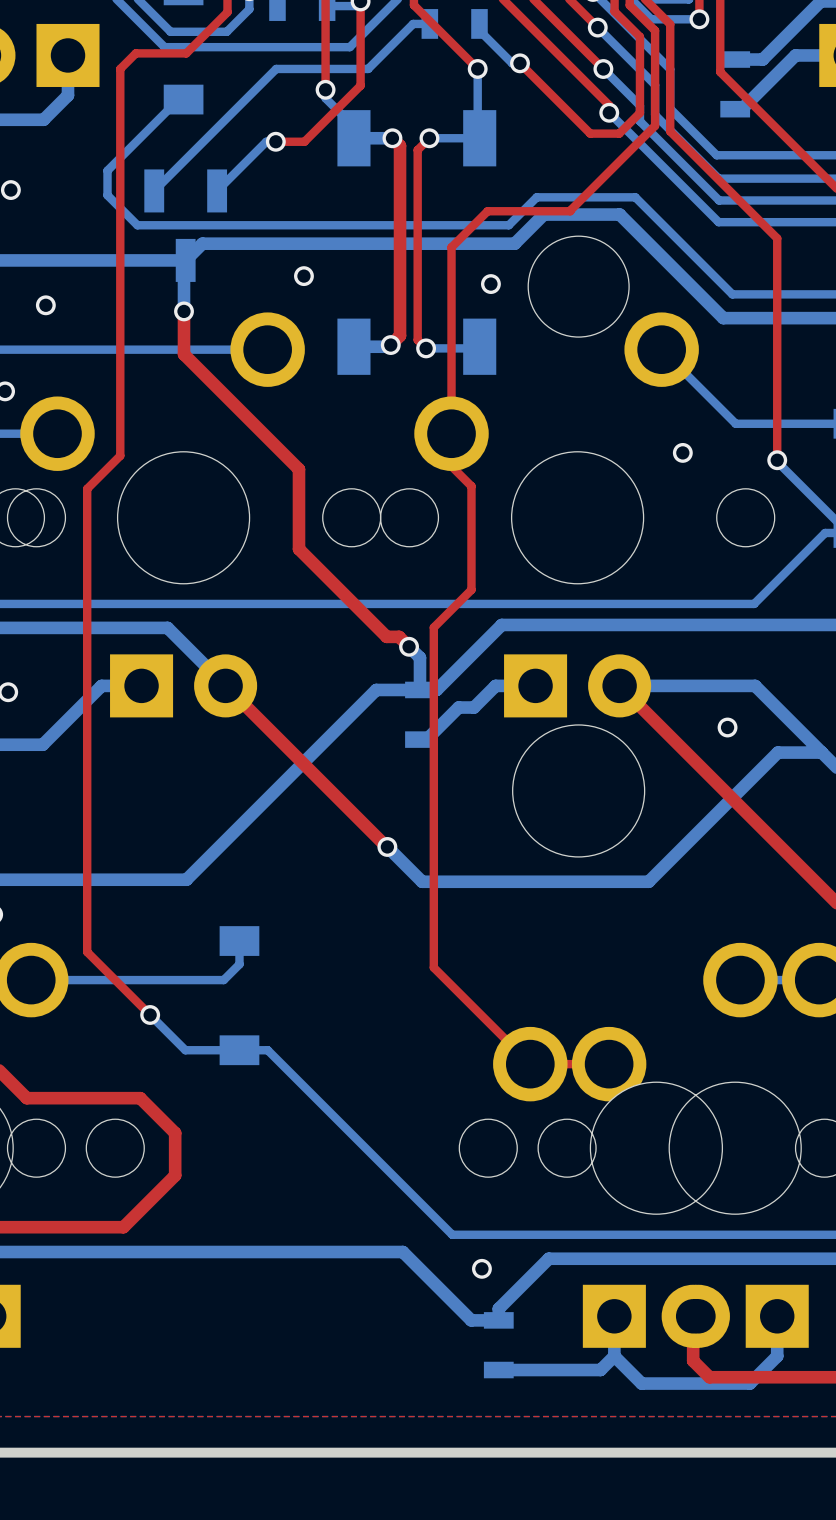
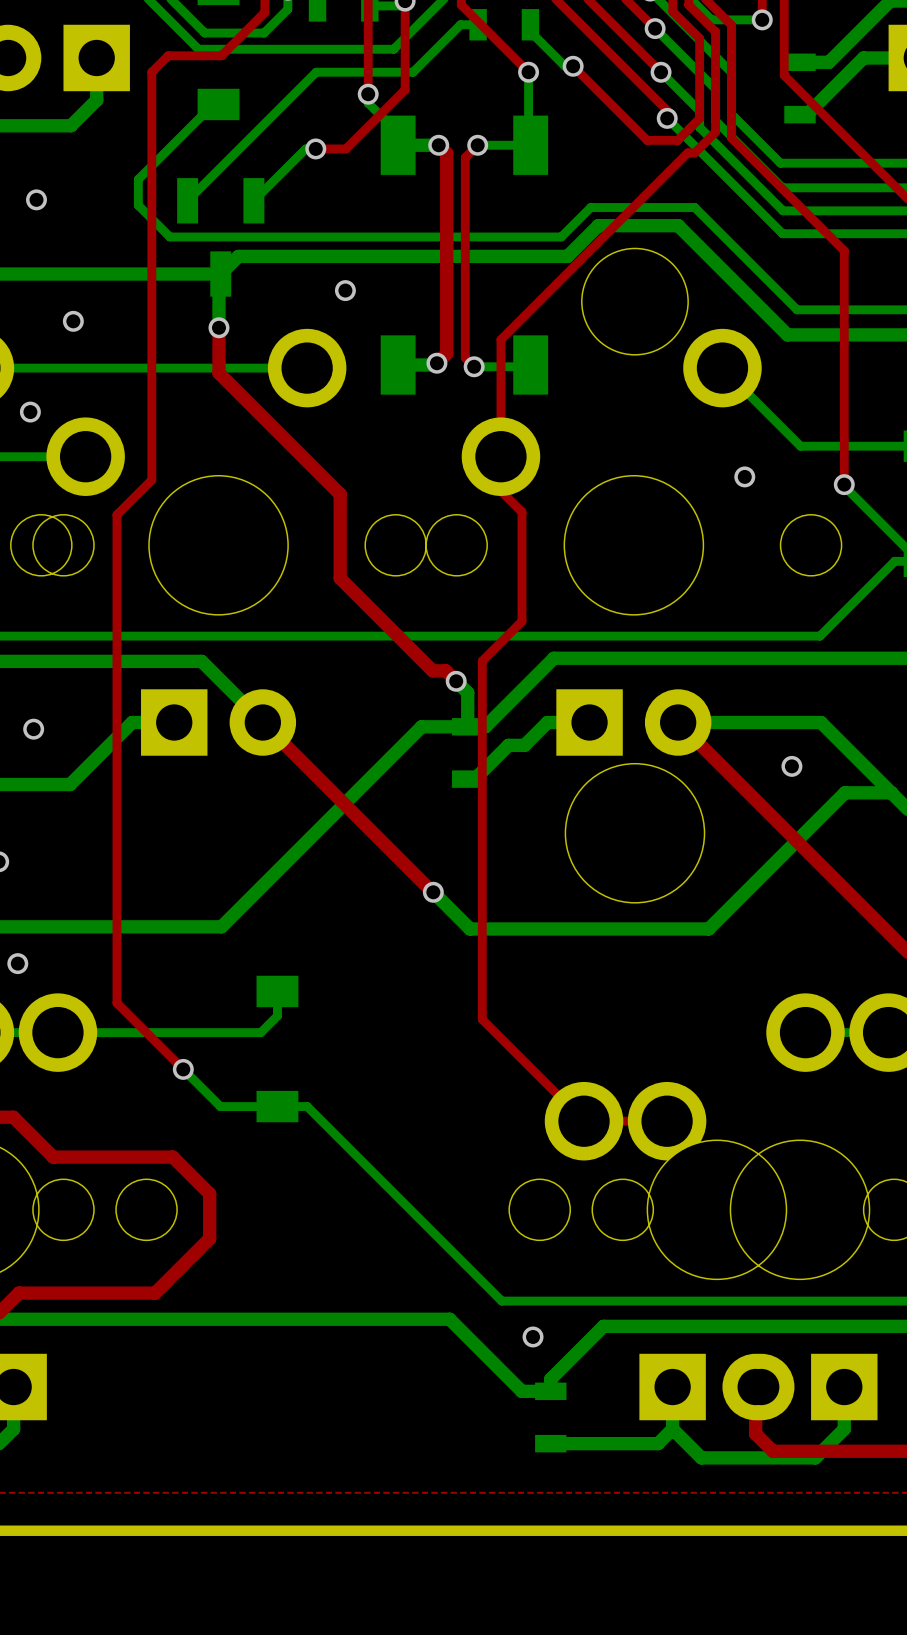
top track: (635, 145) (570, 211) (487, 211) (451, 247) (451, 322) -> (694, 152) (687, 152) (500, 339)
via: (490, 284) -> none

